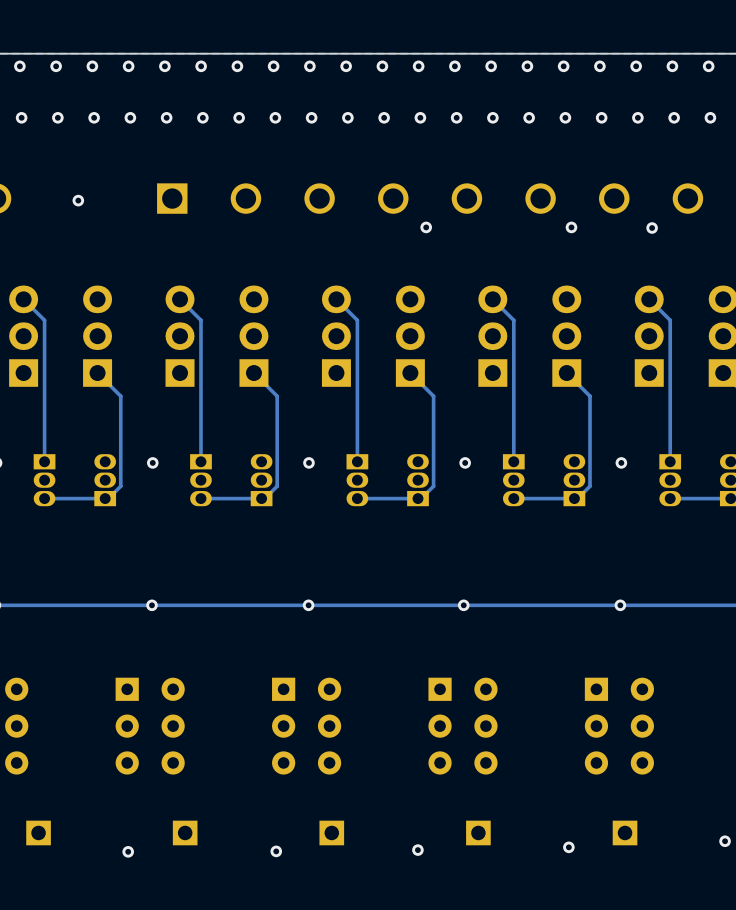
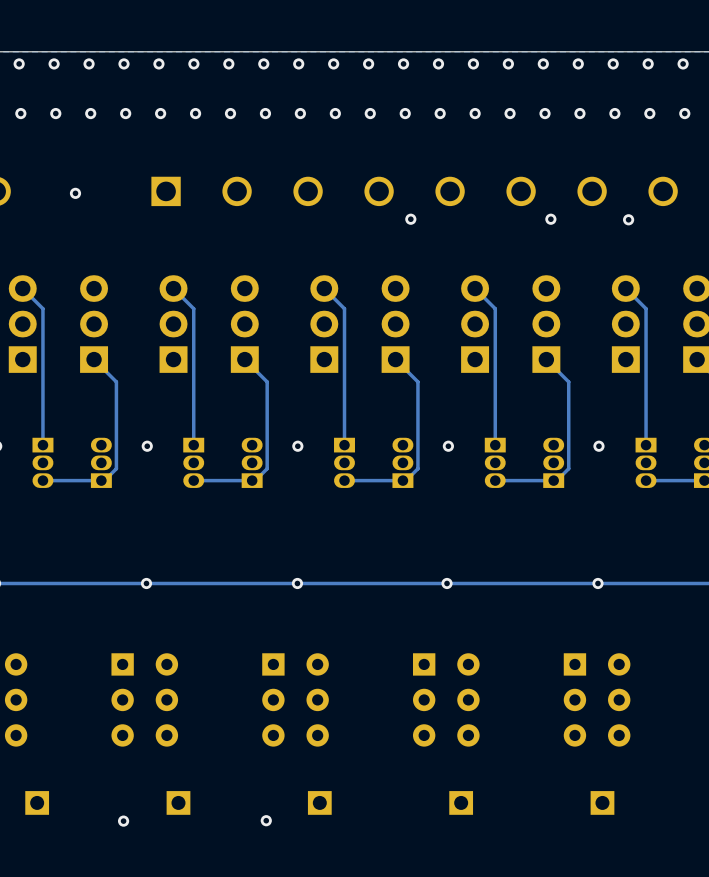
via: (725, 841) -> none
via: (568, 847) -> none
via: (417, 850) -> none

